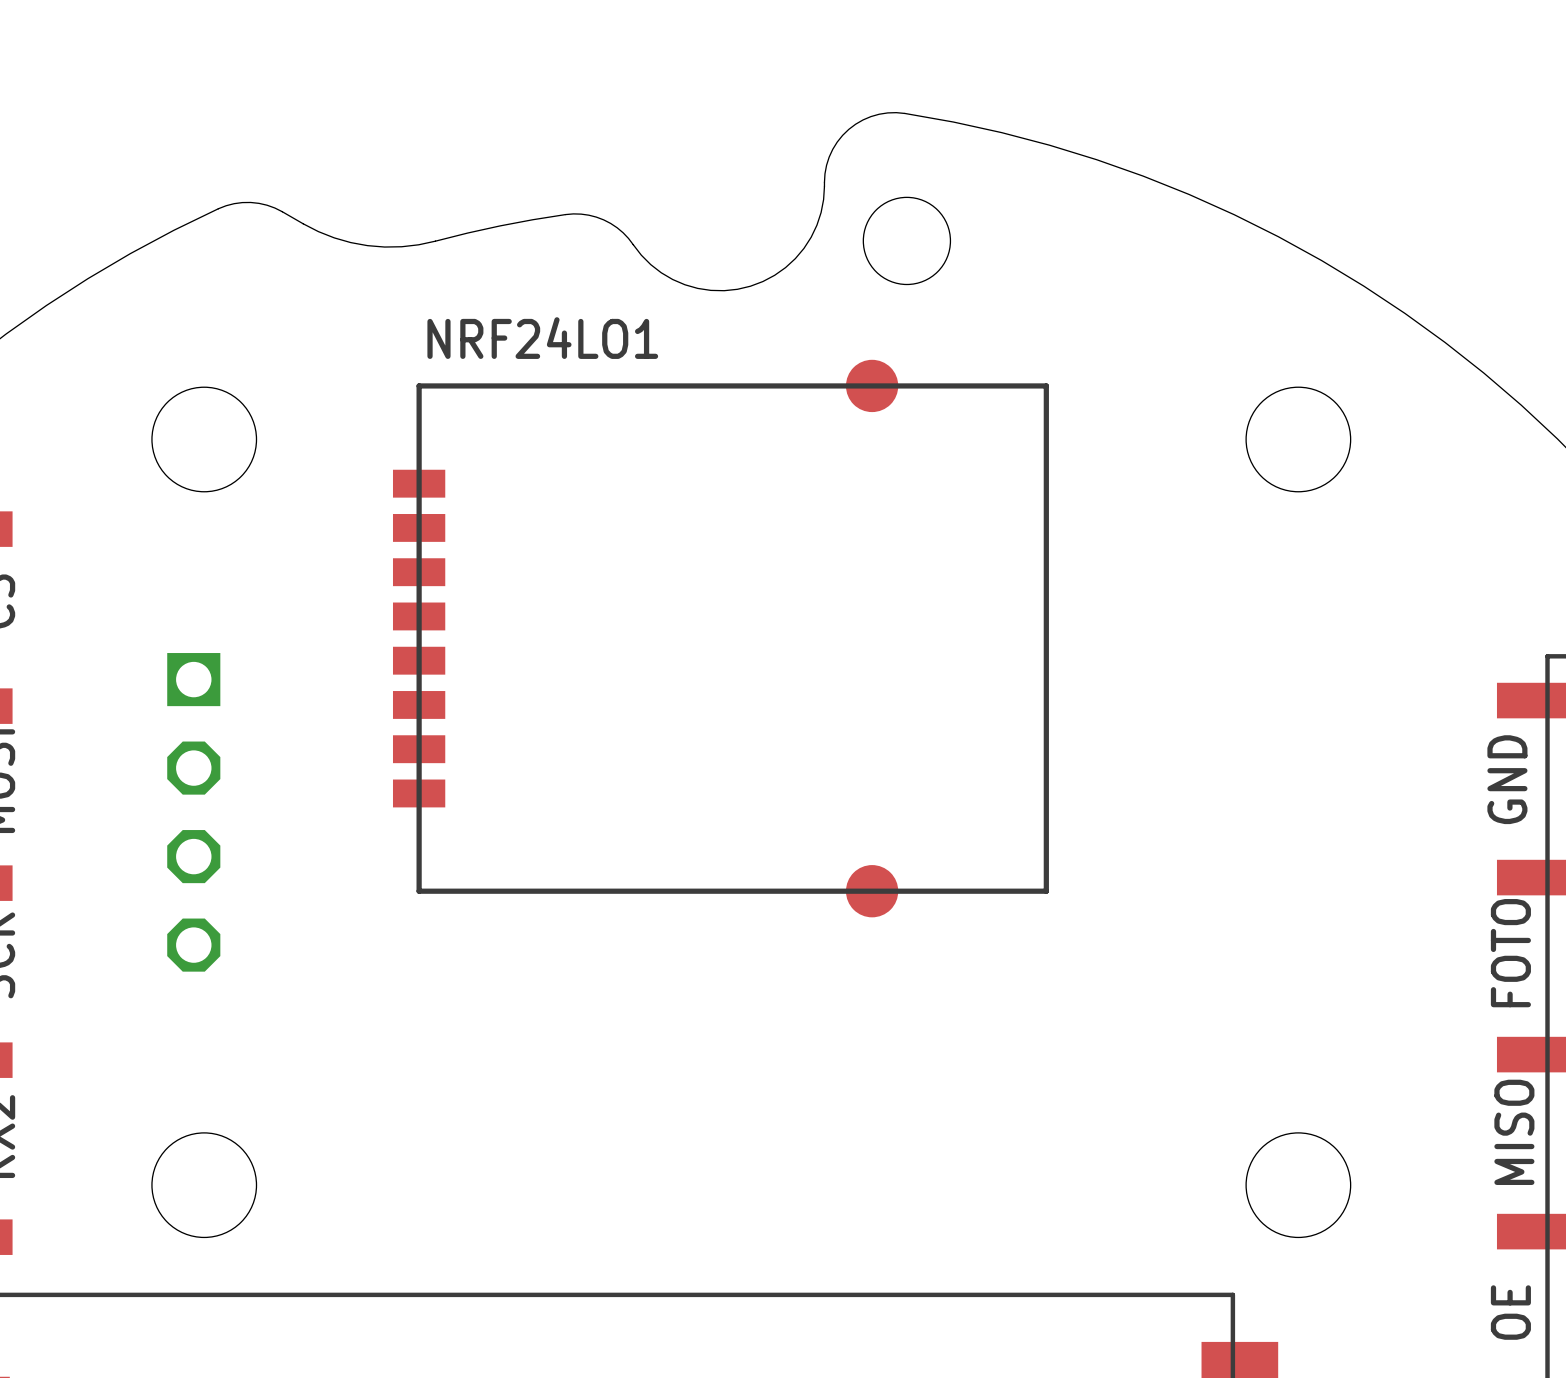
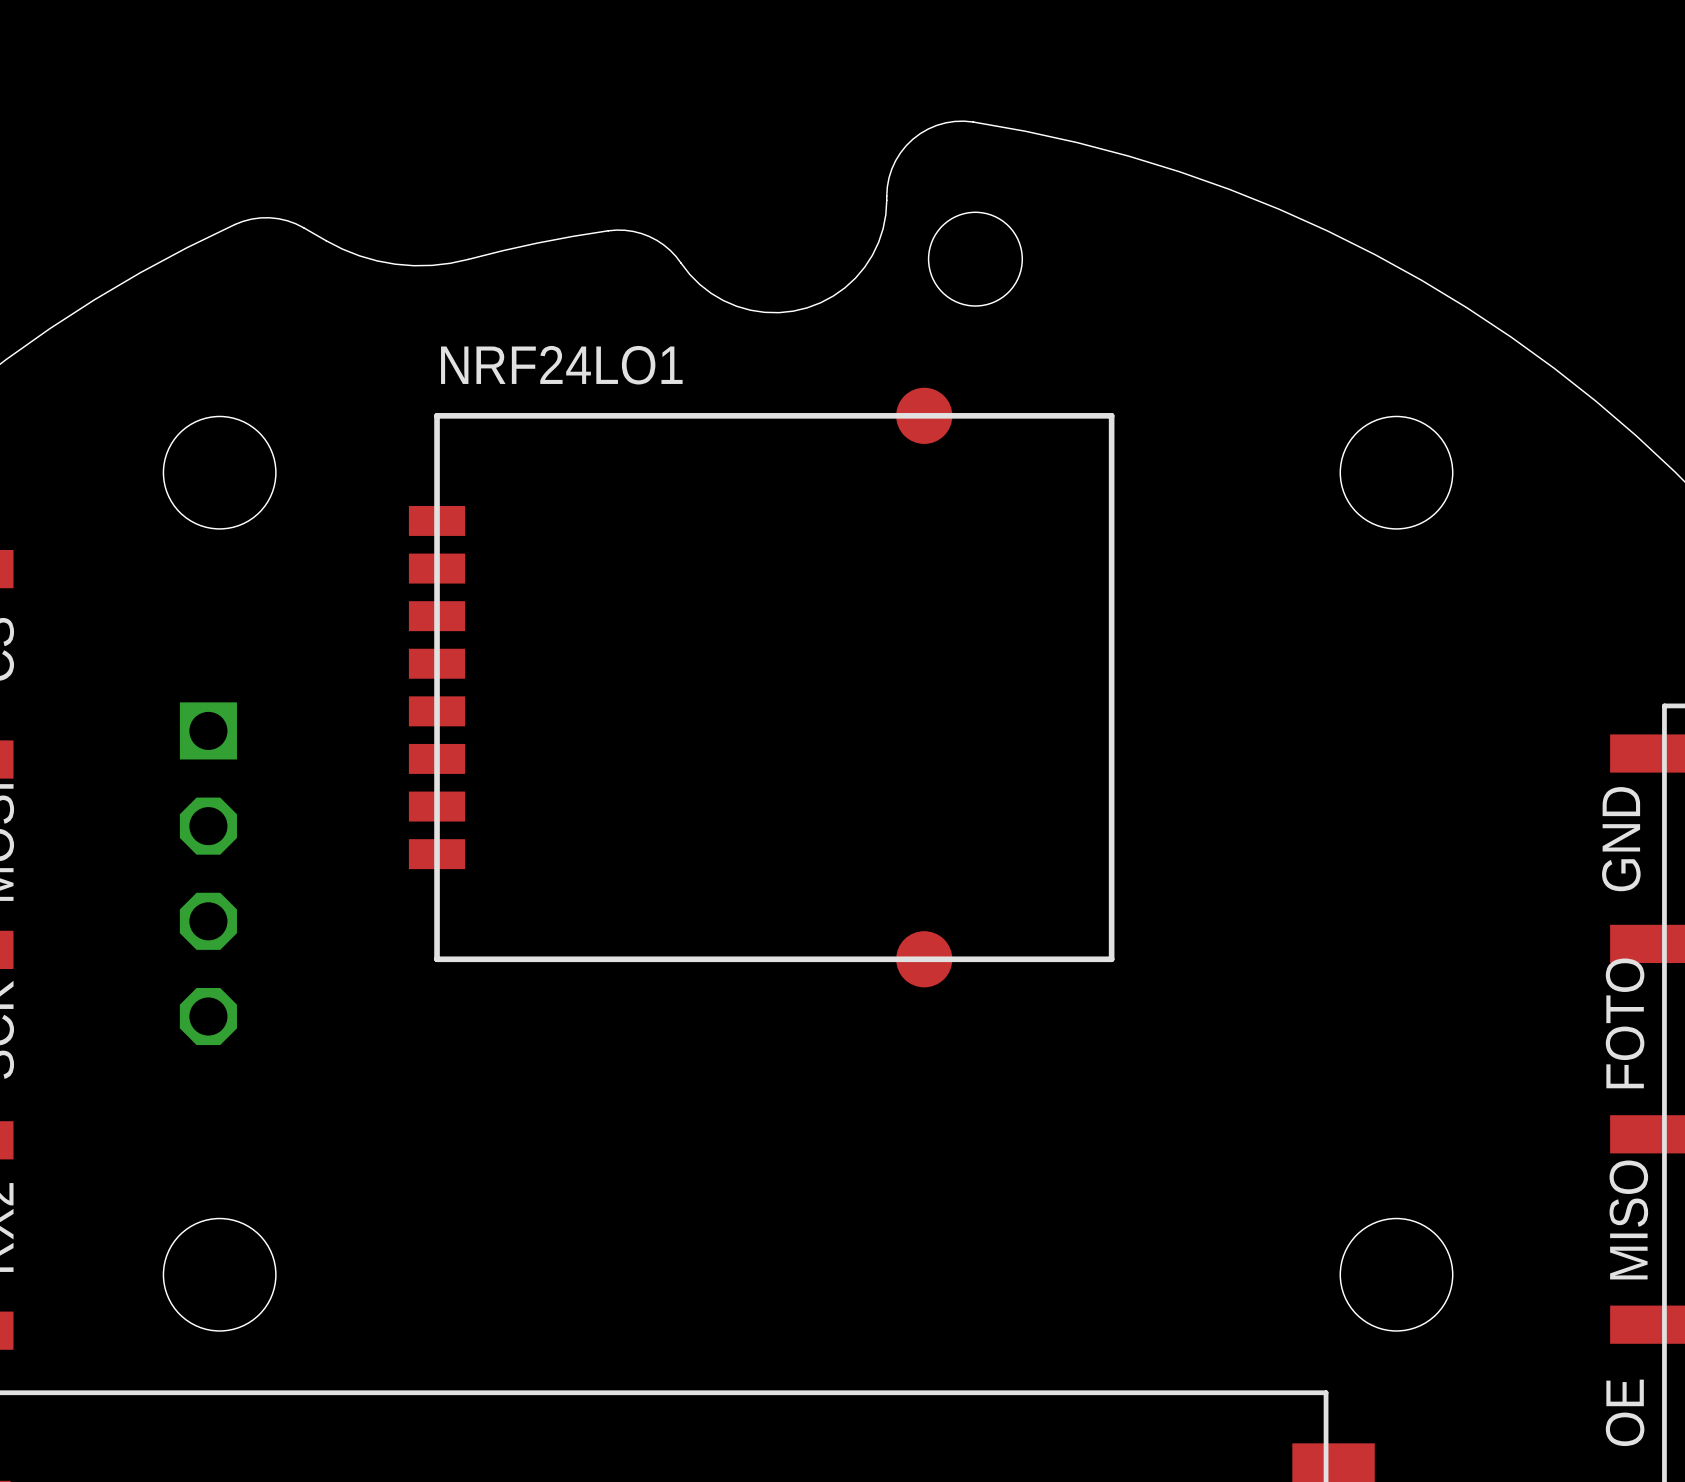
NRF24LO1 position: (720, 638) -> (761, 687)

